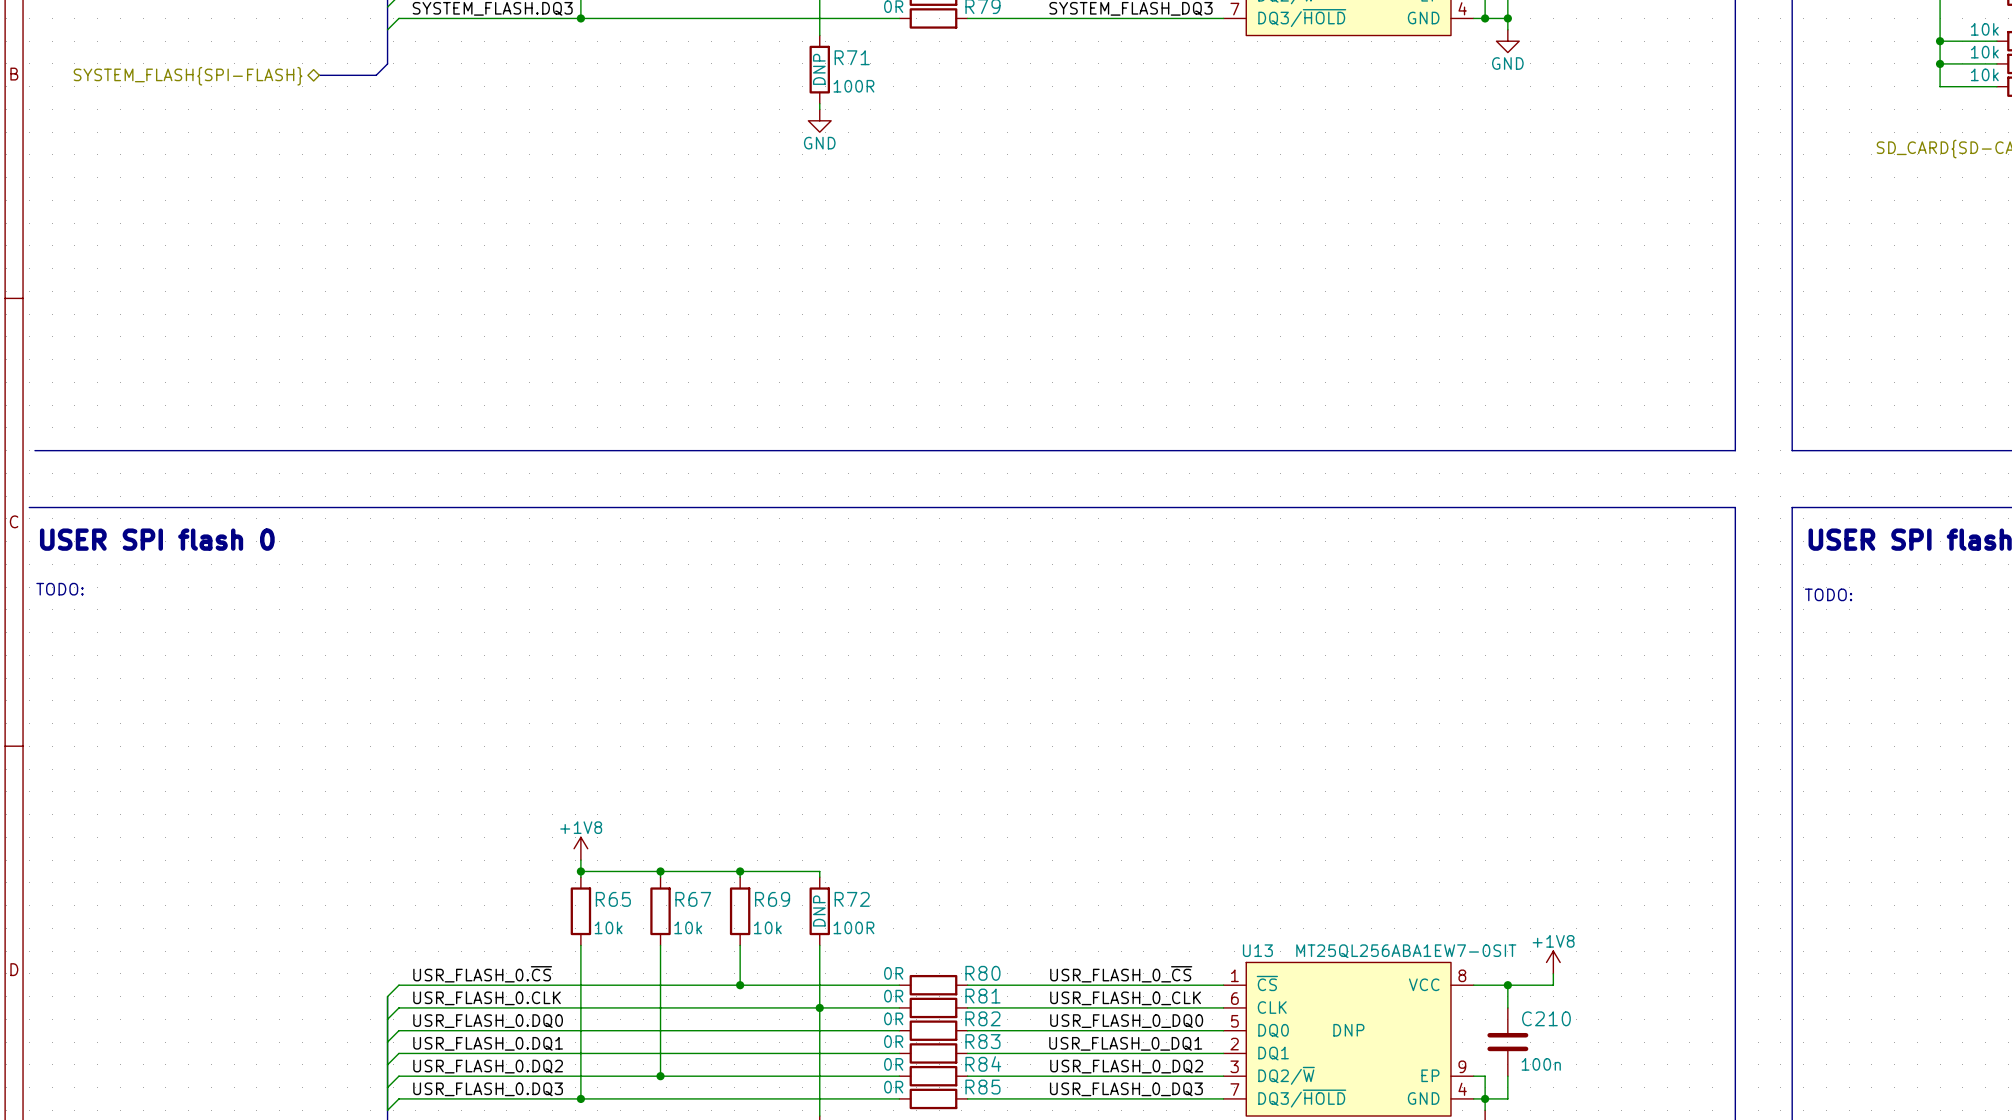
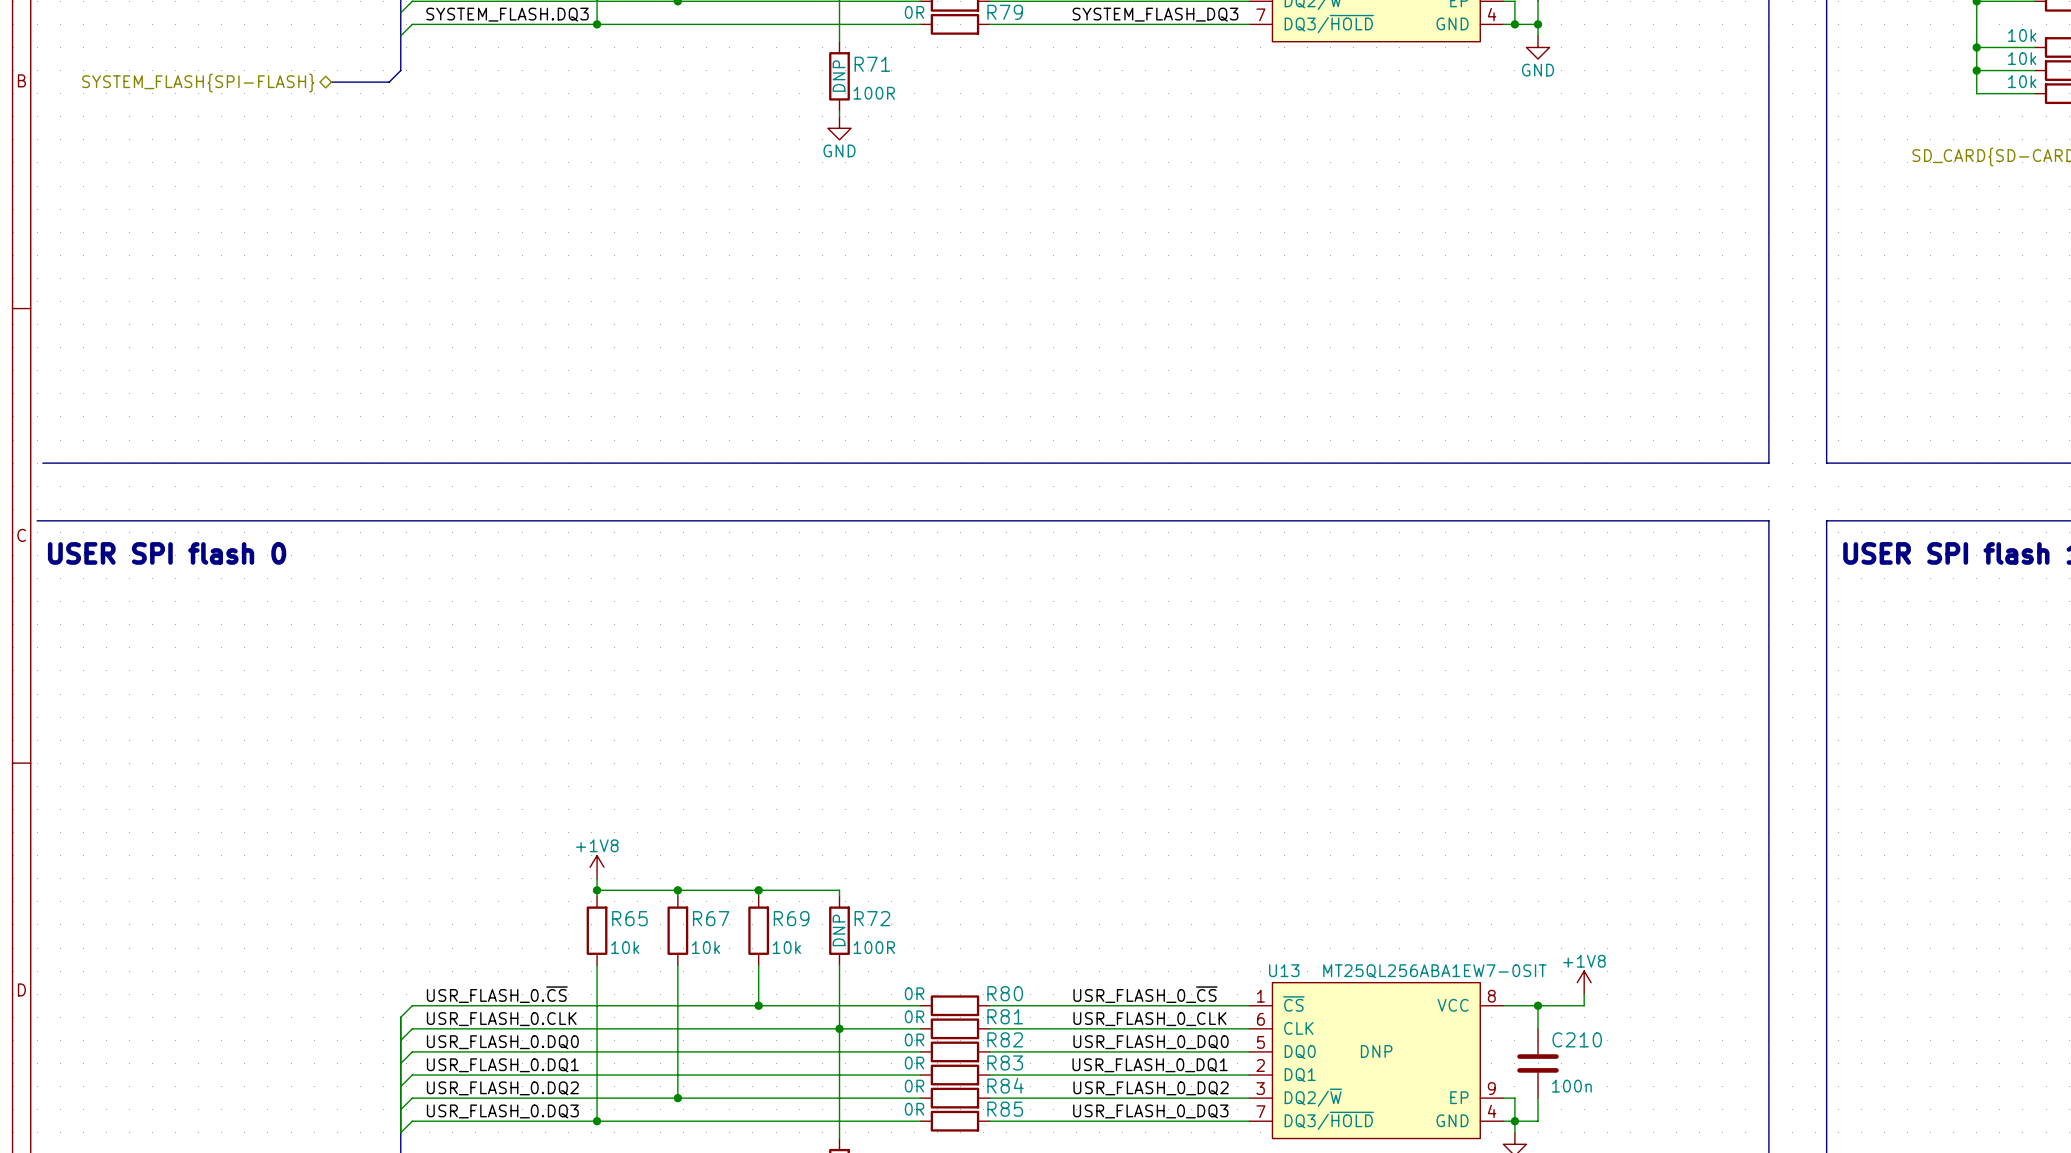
text: TODO: (59, 589) -> none
text: TODO: (1828, 594) -> none

